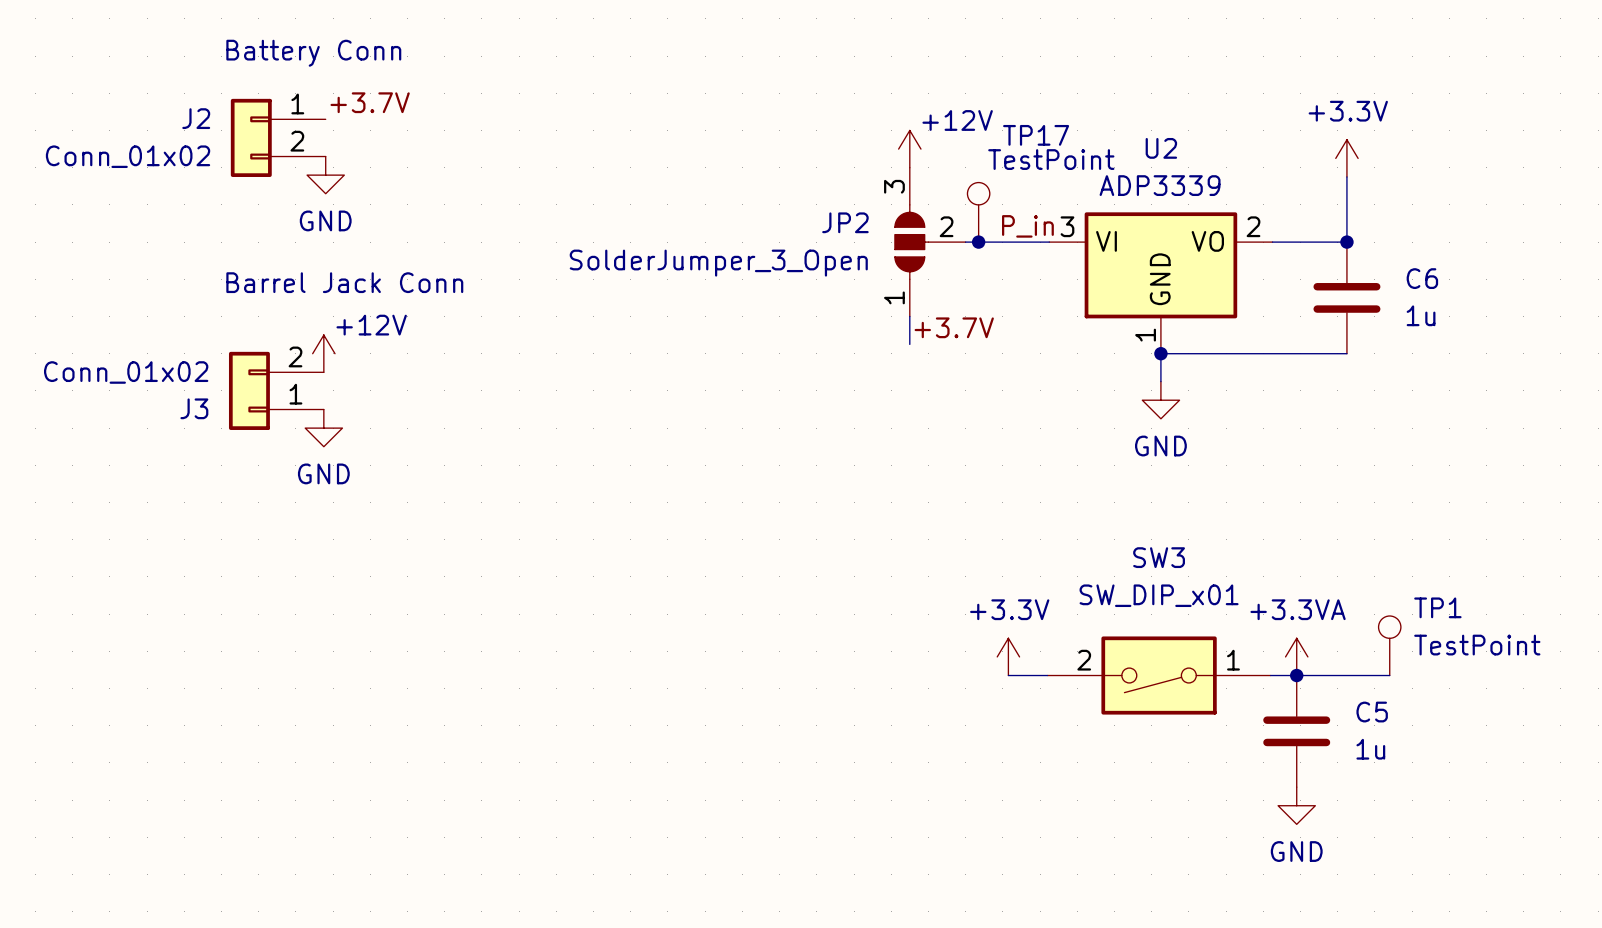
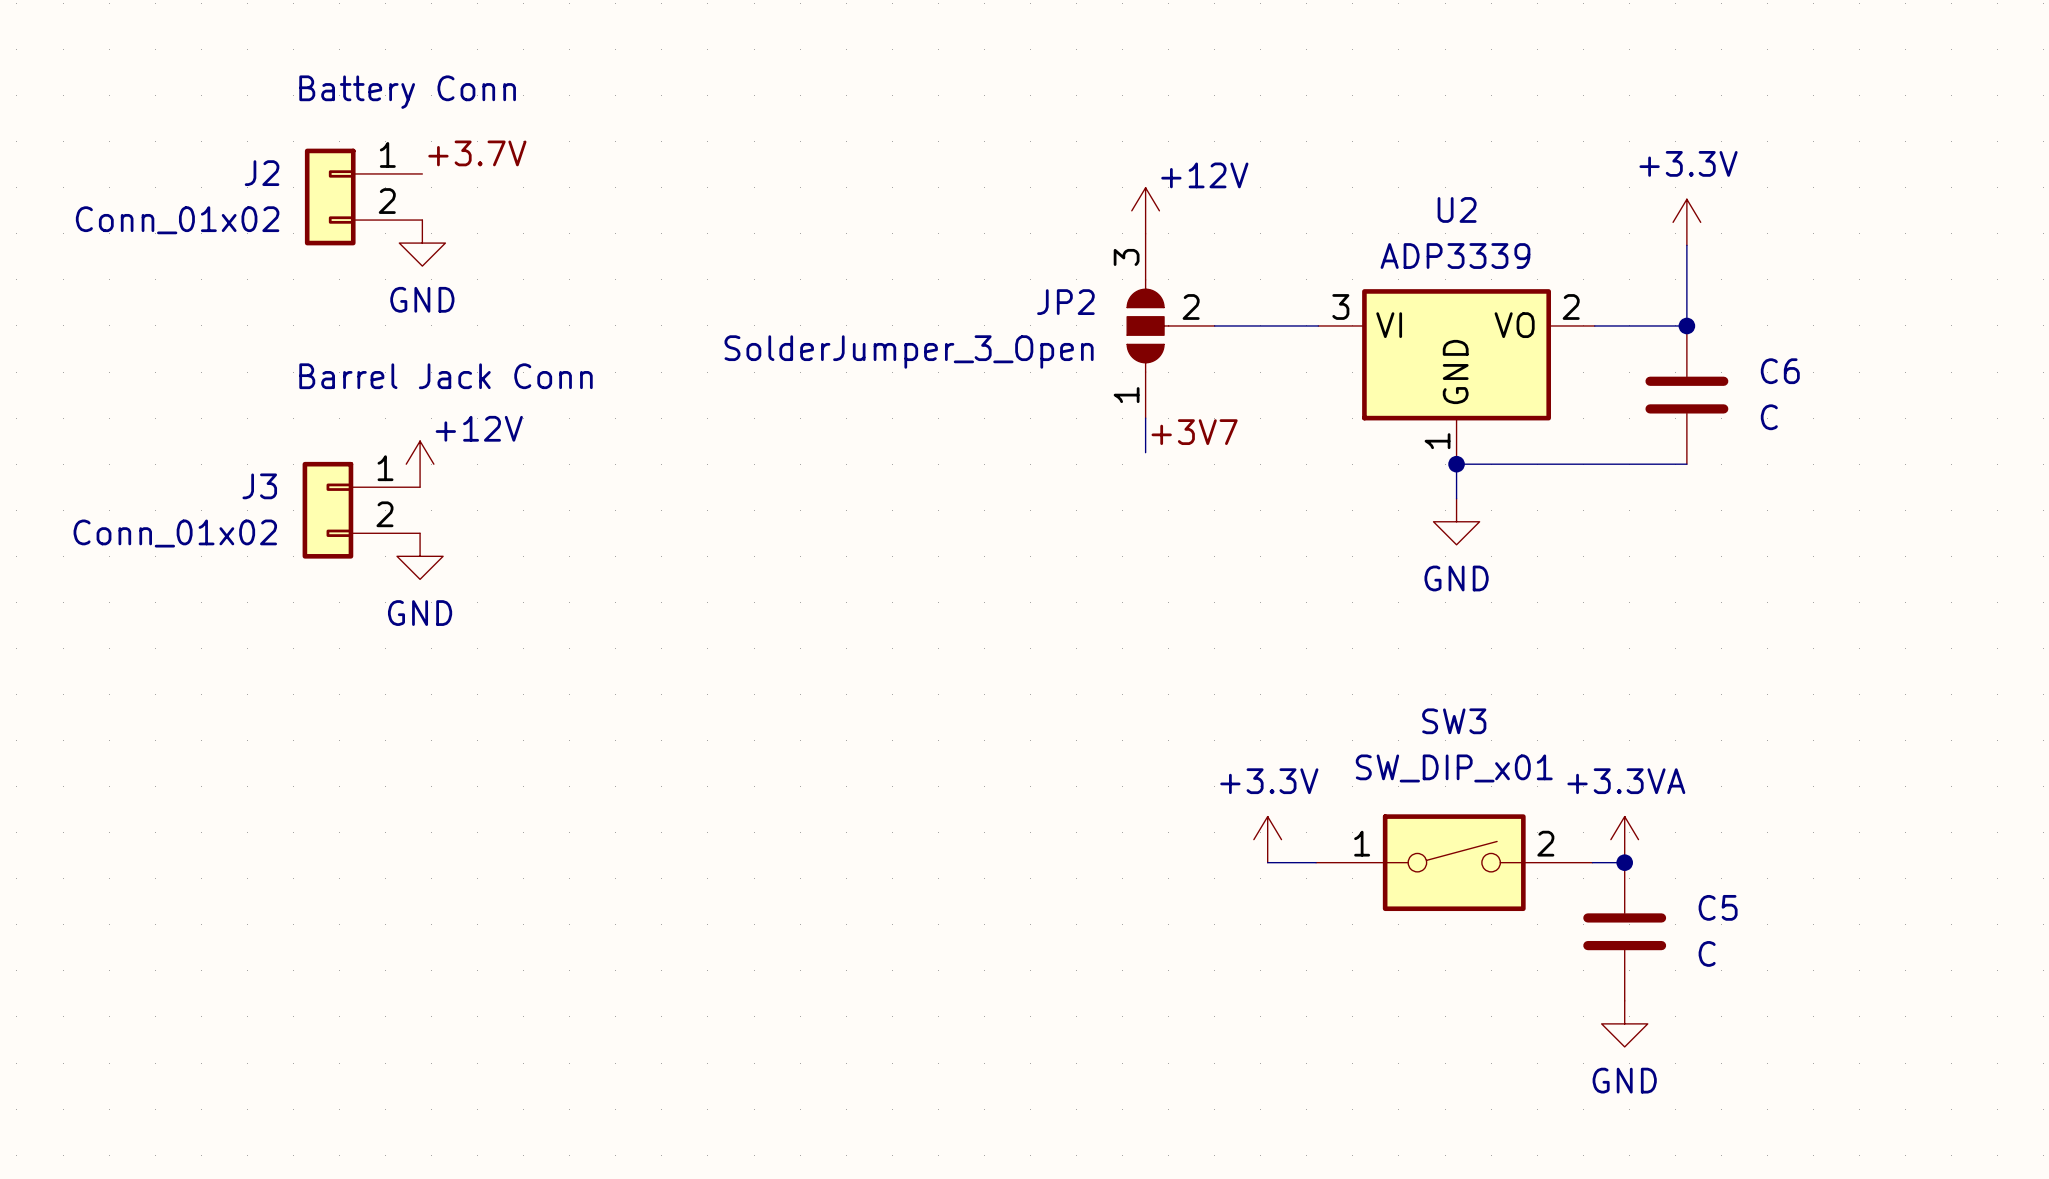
TP17: TestPoint (978, 212) -> none
label: P_in (1027, 226) -> none
junction: (978, 242) -> none
C6 value: 1u (1421, 315) -> C (1769, 417)
label: +3.7V (954, 327) -> +3V7 (1194, 432)
J3 flip: as is (249, 390) -> up-down (327, 510)
TP1: TestPoint (1389, 645) -> none
SW3 rotation: 0° (1159, 675) -> 180° (1454, 862)
wire: (1296, 675) (1389, 675) -> none
C5 value: 1u (1370, 749) -> C (1707, 953)

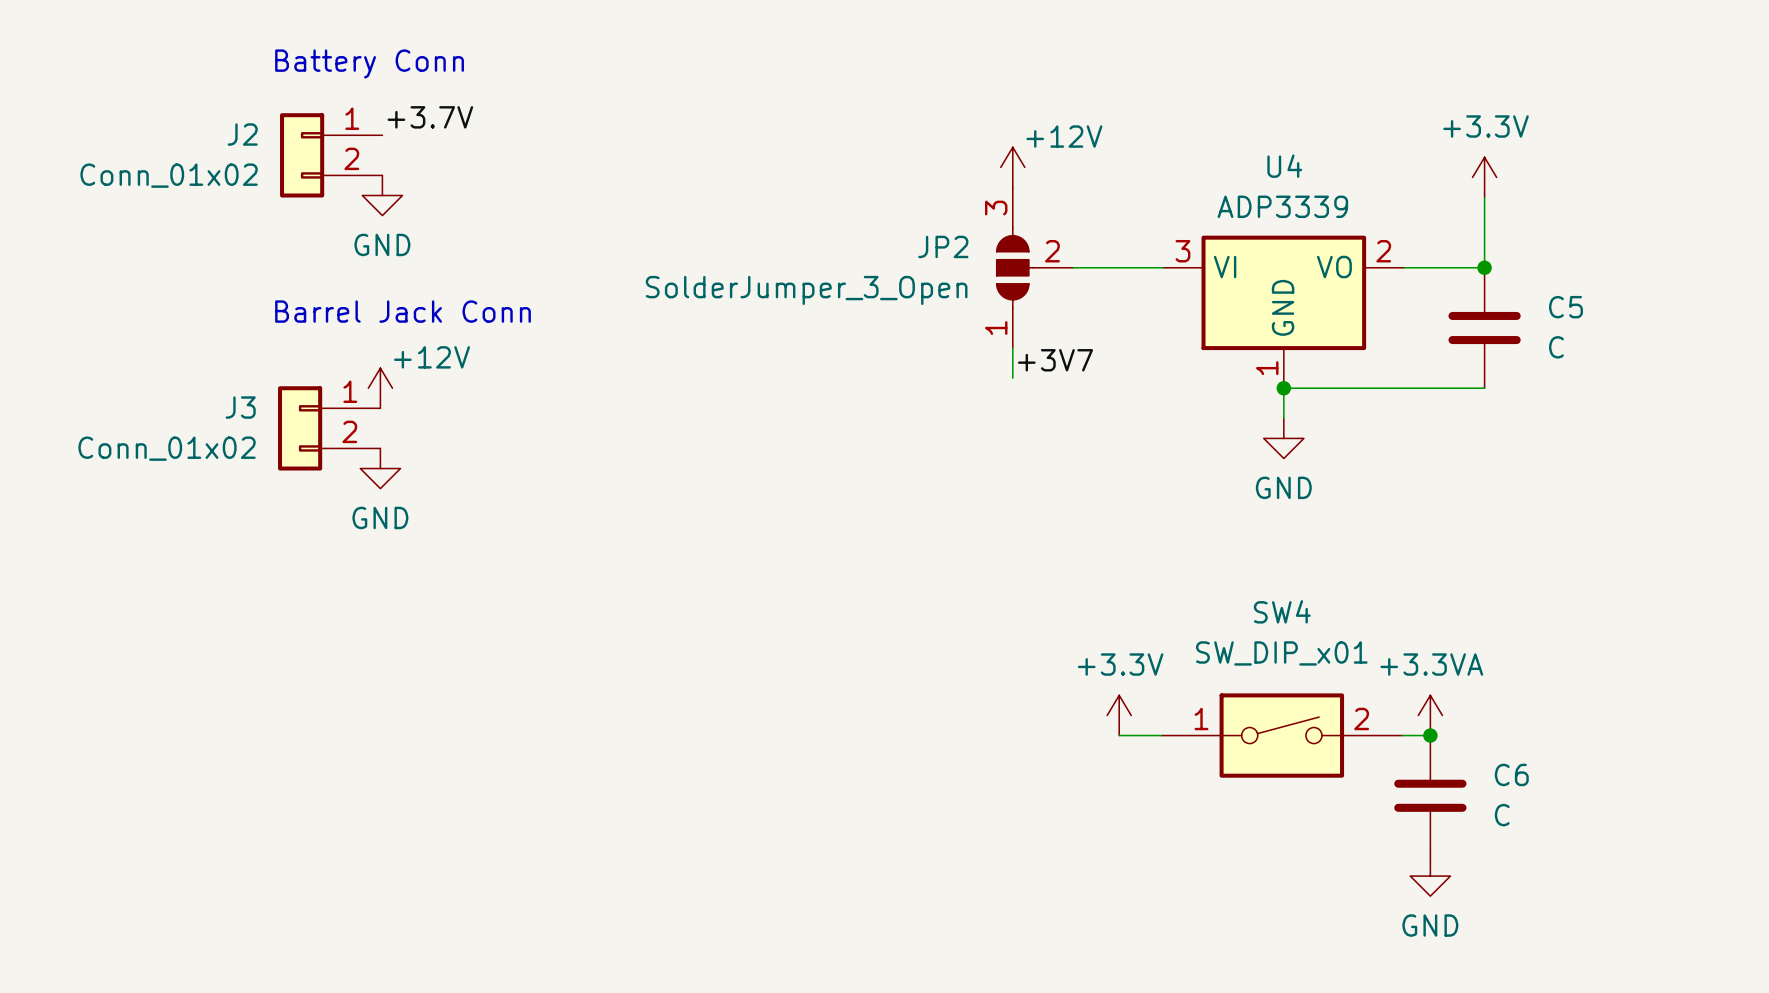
U2 name: U2 (1457, 209) -> U4 (1284, 166)
C6 name: C6 (1780, 371) -> C5 (1565, 307)
SW3 name: SW3 (1454, 721) -> SW4 (1282, 611)
C5 name: C5 (1718, 907) -> C6 (1511, 774)

